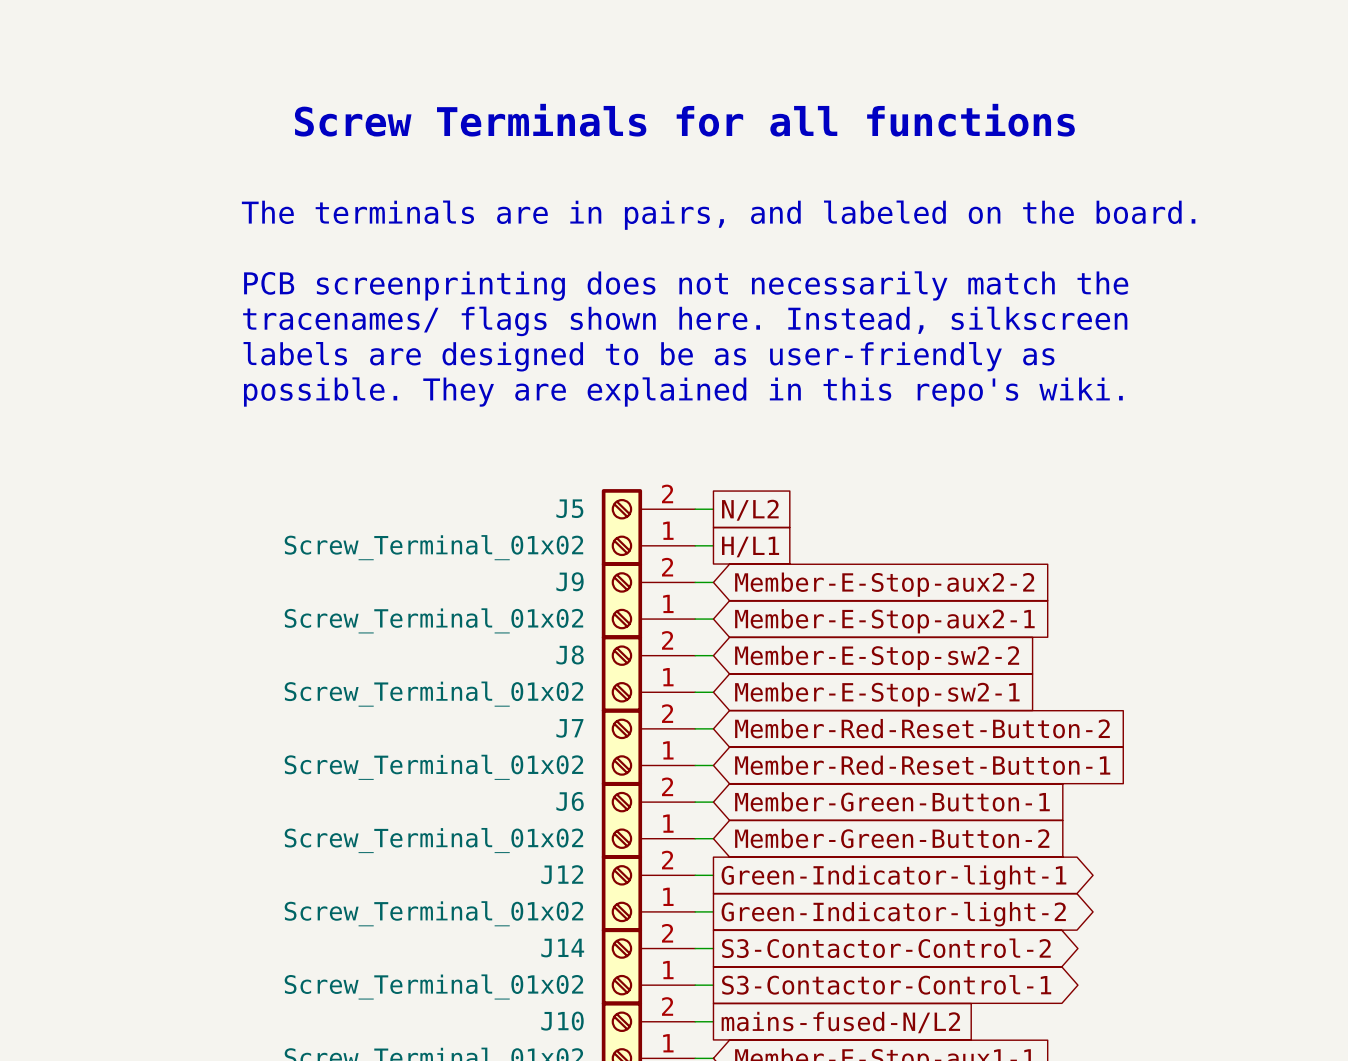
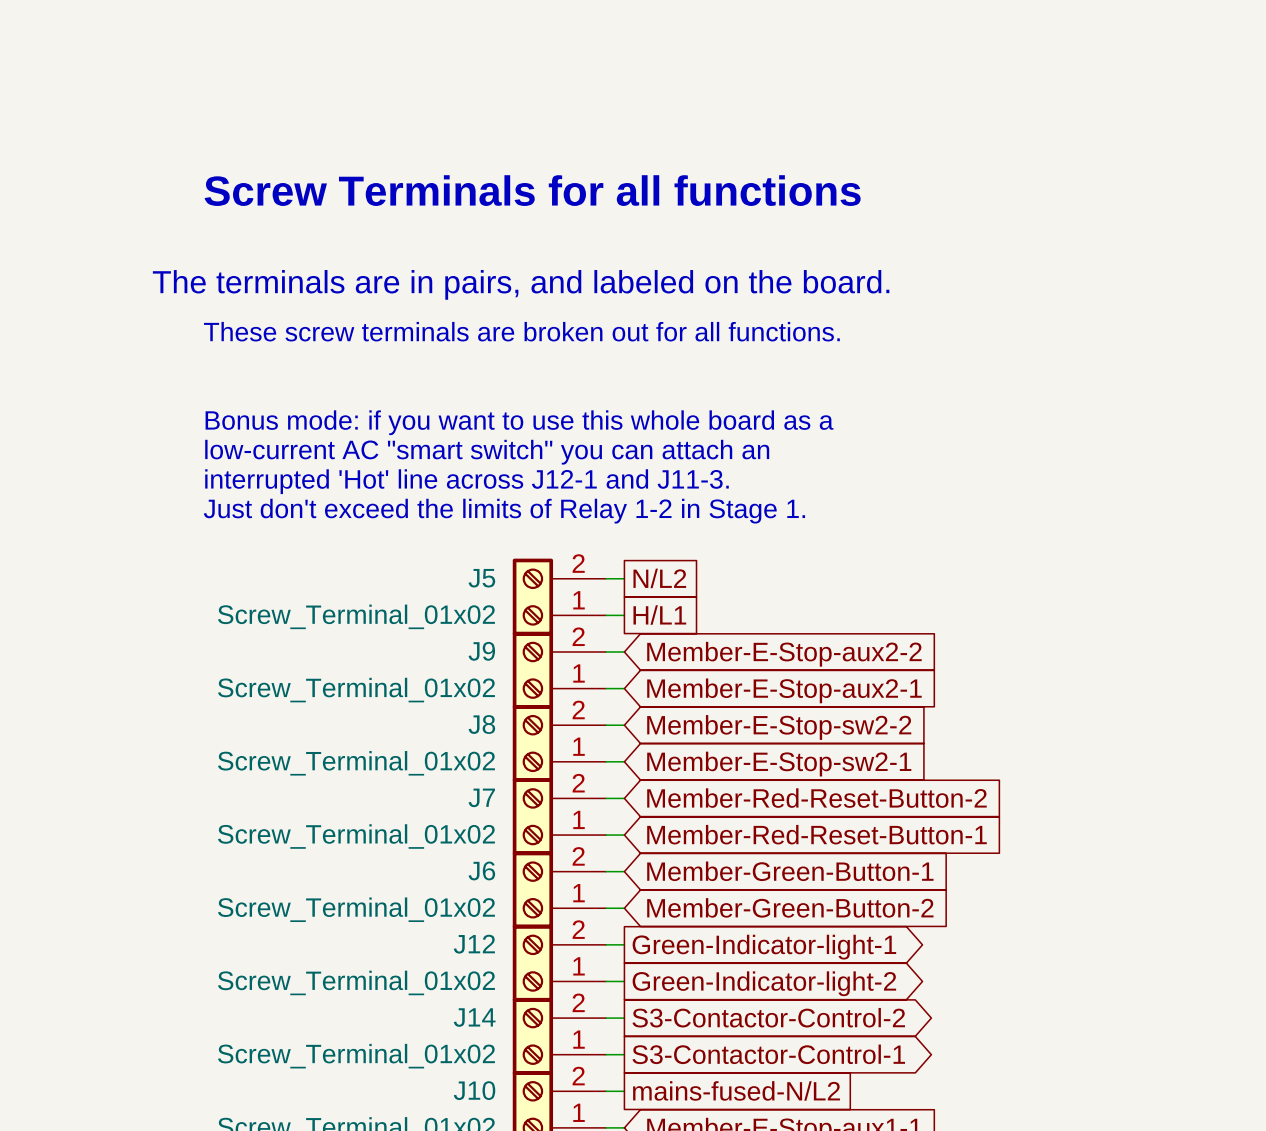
text: none -> These screw terminals are broken out for all functions. (521, 331)
text: PCB screenprinting does not necessarily match the (686, 286) -> none
text: tracenames/ flags shown here. Instead, silkscreen (685, 321) -> none
text: none -> Bonus mode: if you want to use this whole board as a (519, 422)
text: labels are designed to be as user-friendly as (649, 356) -> none
text: none -> low-current AC "smart switch" you can attach an (487, 452)
text: possible. They are explained in this repo's wiki. (683, 392) -> none
text: none -> interrupted 'Hot' line across J12-1 and J11-3. (466, 481)
text: none -> Just don't exceed the limits of Relay 1-2 in Stage 1. (504, 511)

